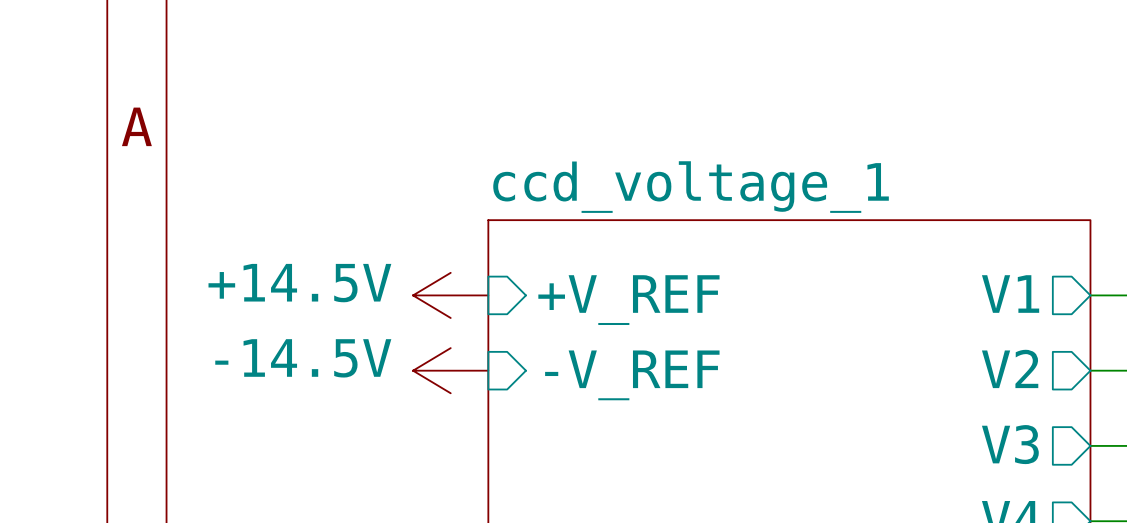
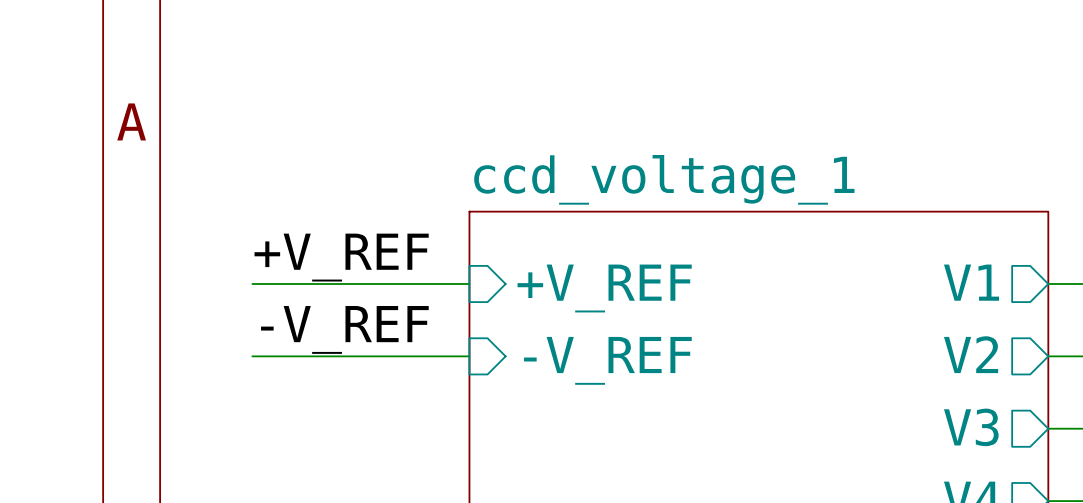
label: none -> +V_REF (341, 257)
wire: none -> (252, 284) (469, 284)
power symbol: +14.5V (450, 295) -> none
label: none -> -V_REF (344, 329)
wire: none -> (252, 356) (469, 356)
power symbol: -14.5V (450, 370) -> none

